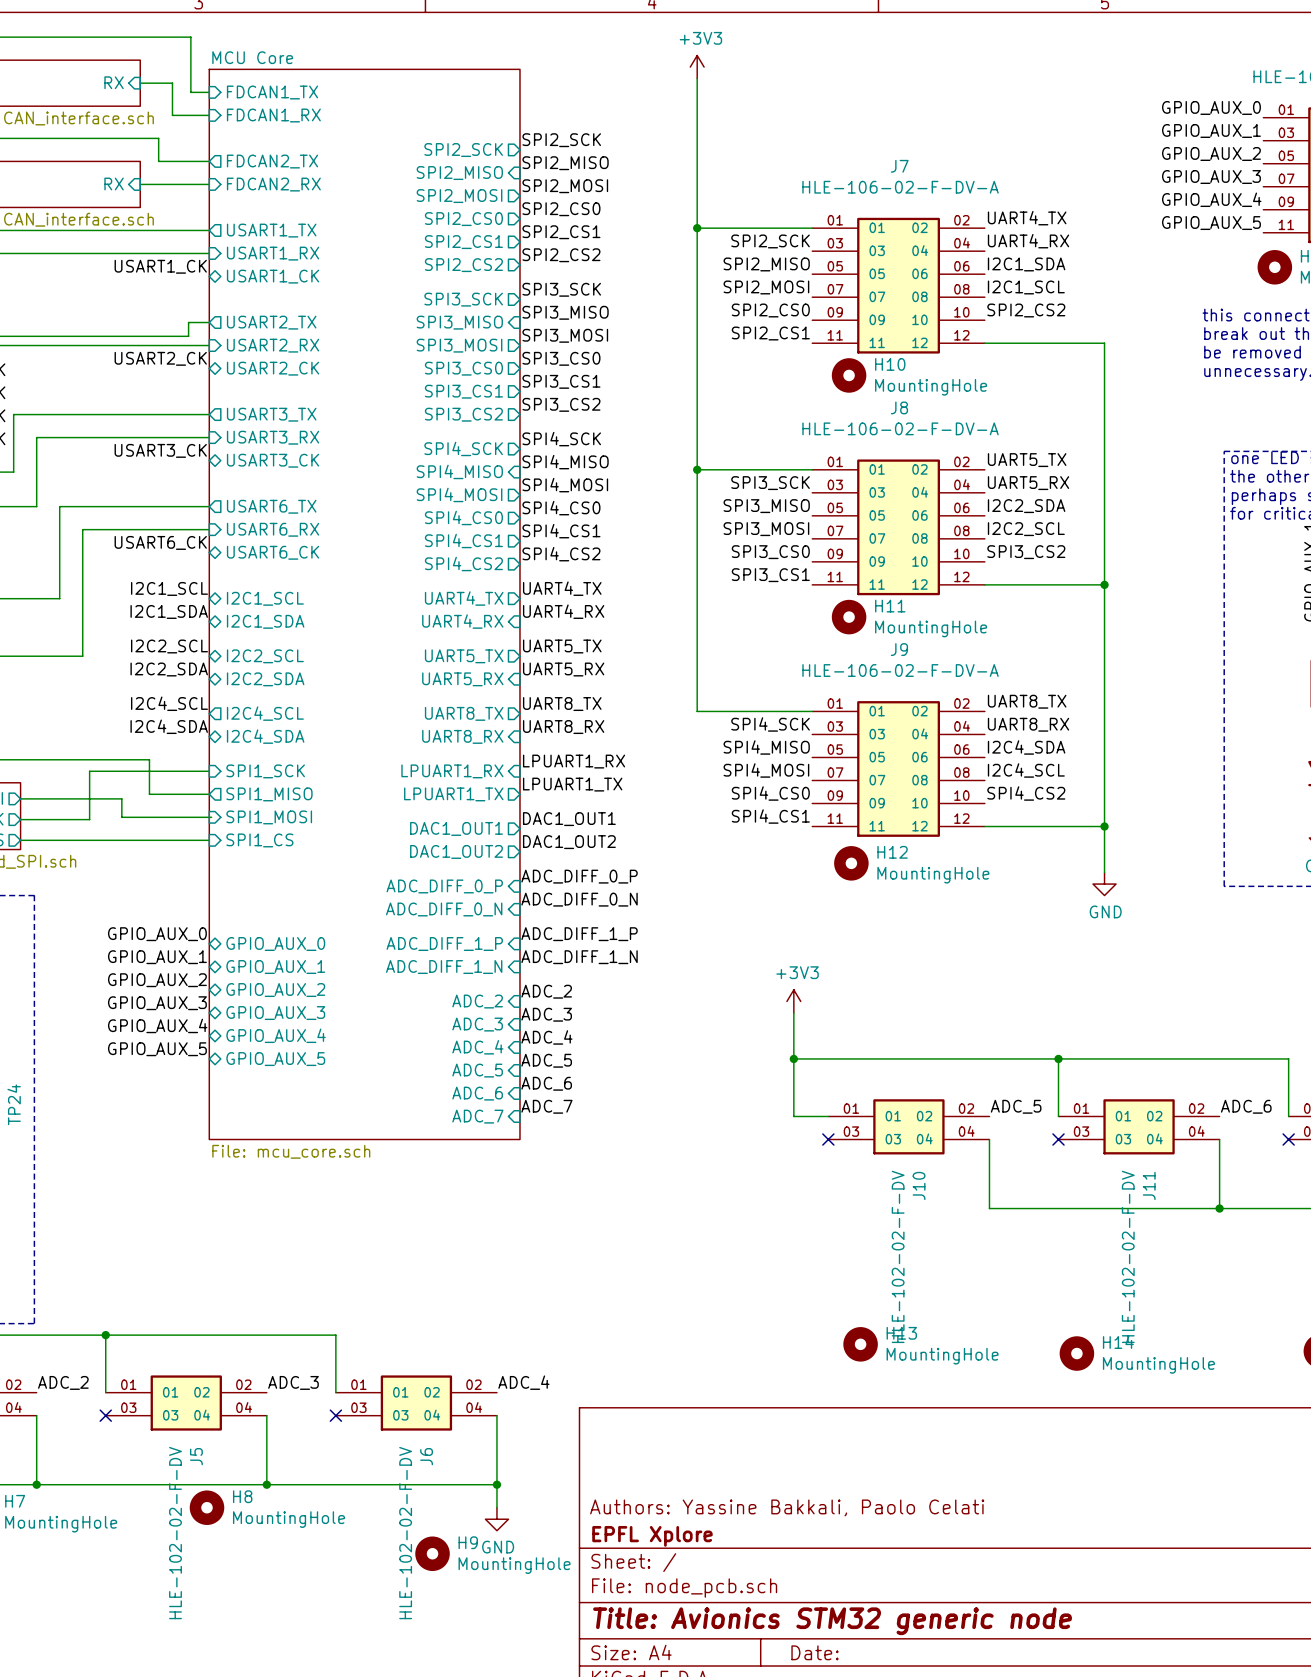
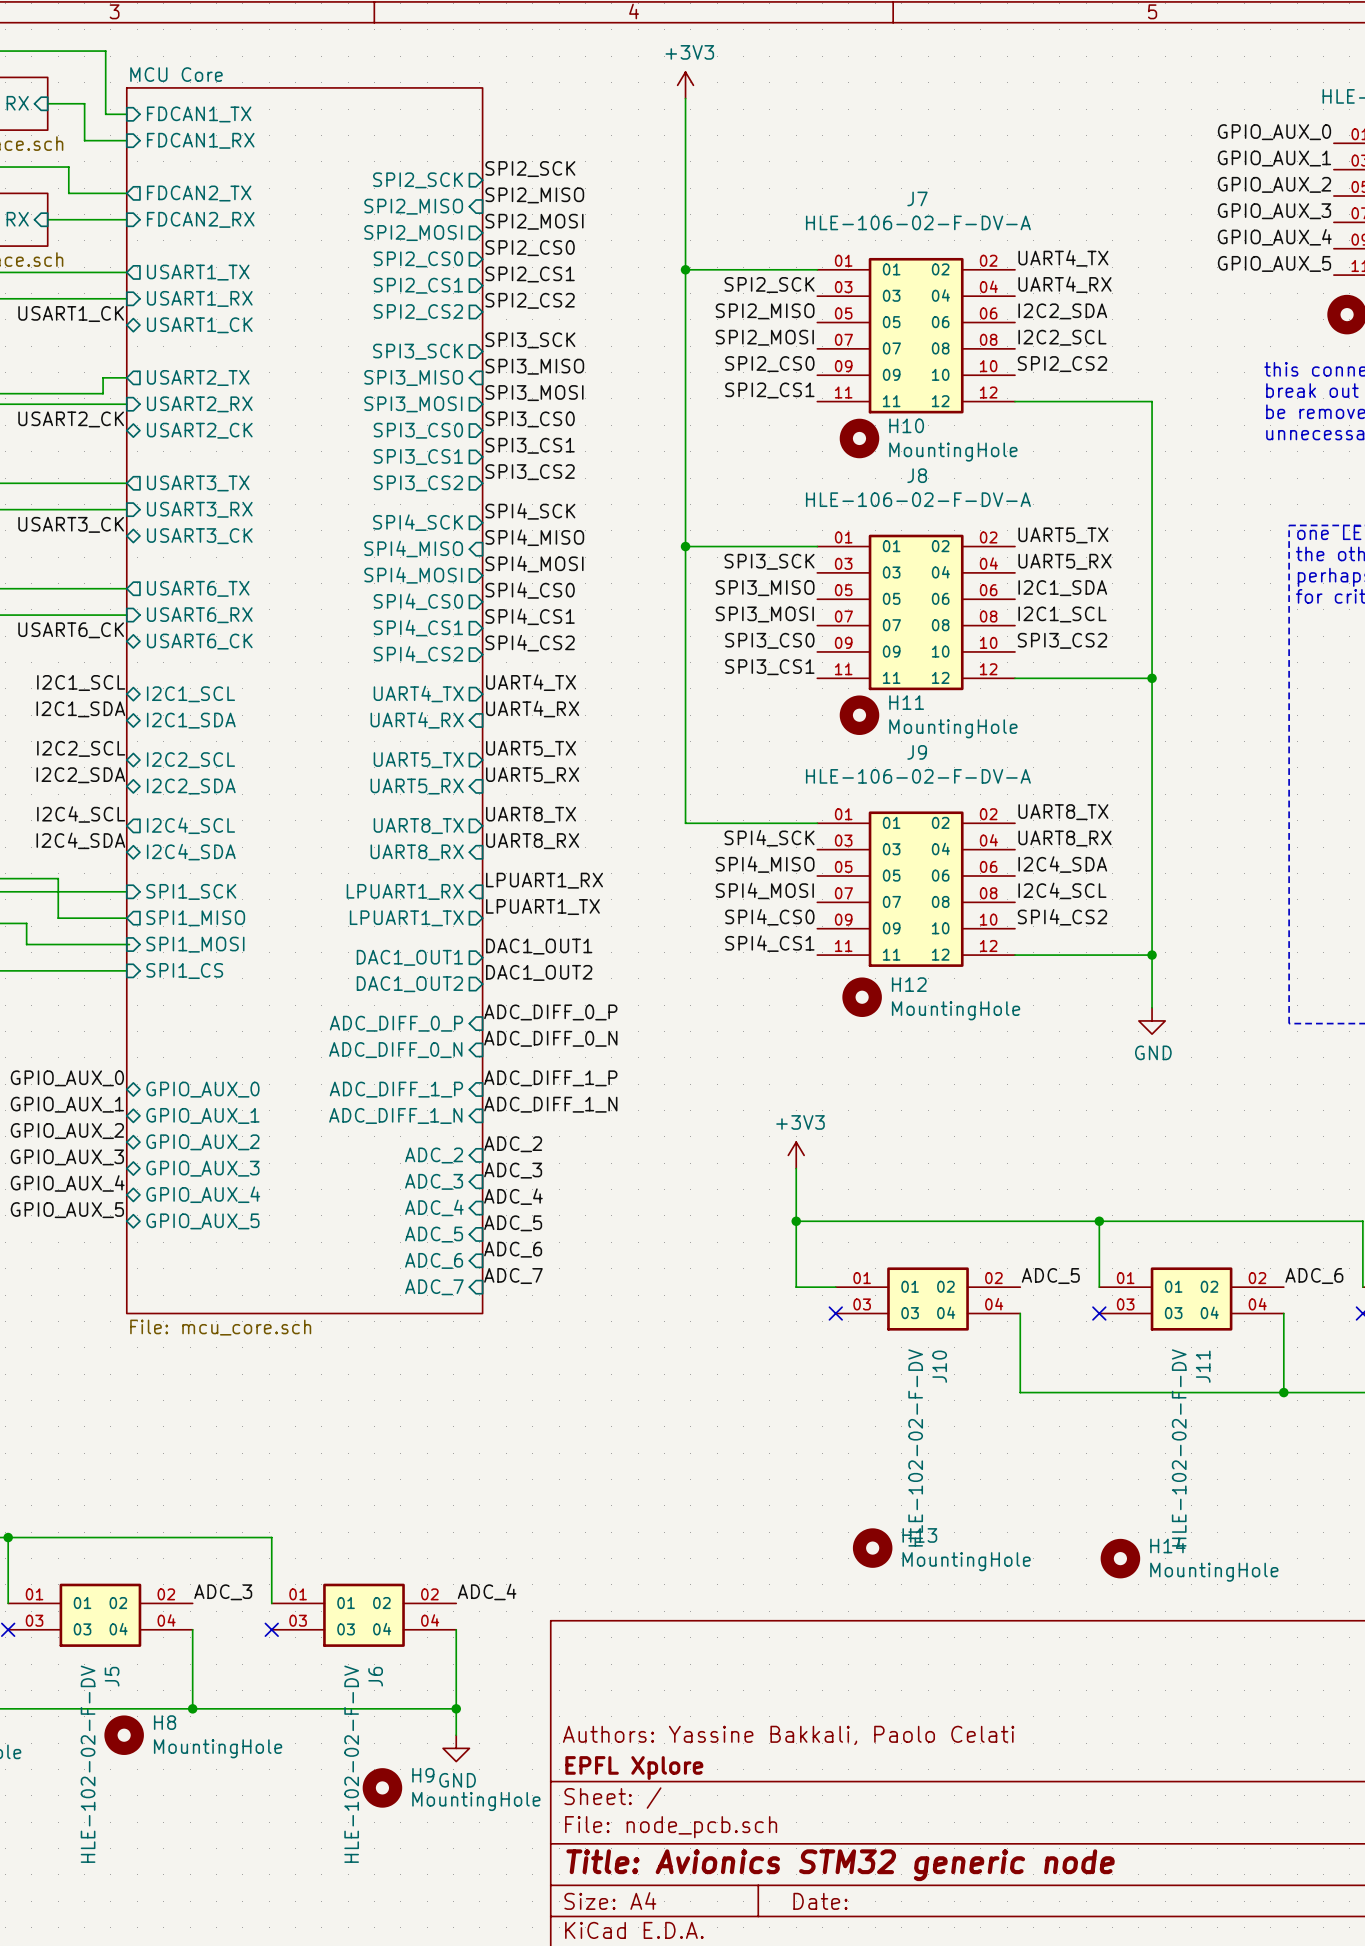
label: I2C1_SDA (1026, 264) -> I2C2_SDA (1062, 311)
label: I2C1_SCL (1026, 287) -> I2C2_SCL (1062, 337)
label: I2C2_SDA (1026, 506) -> I2C1_SDA (1062, 588)
label: I2C2_SCL (1026, 529) -> I2C1_SCL (1062, 614)

